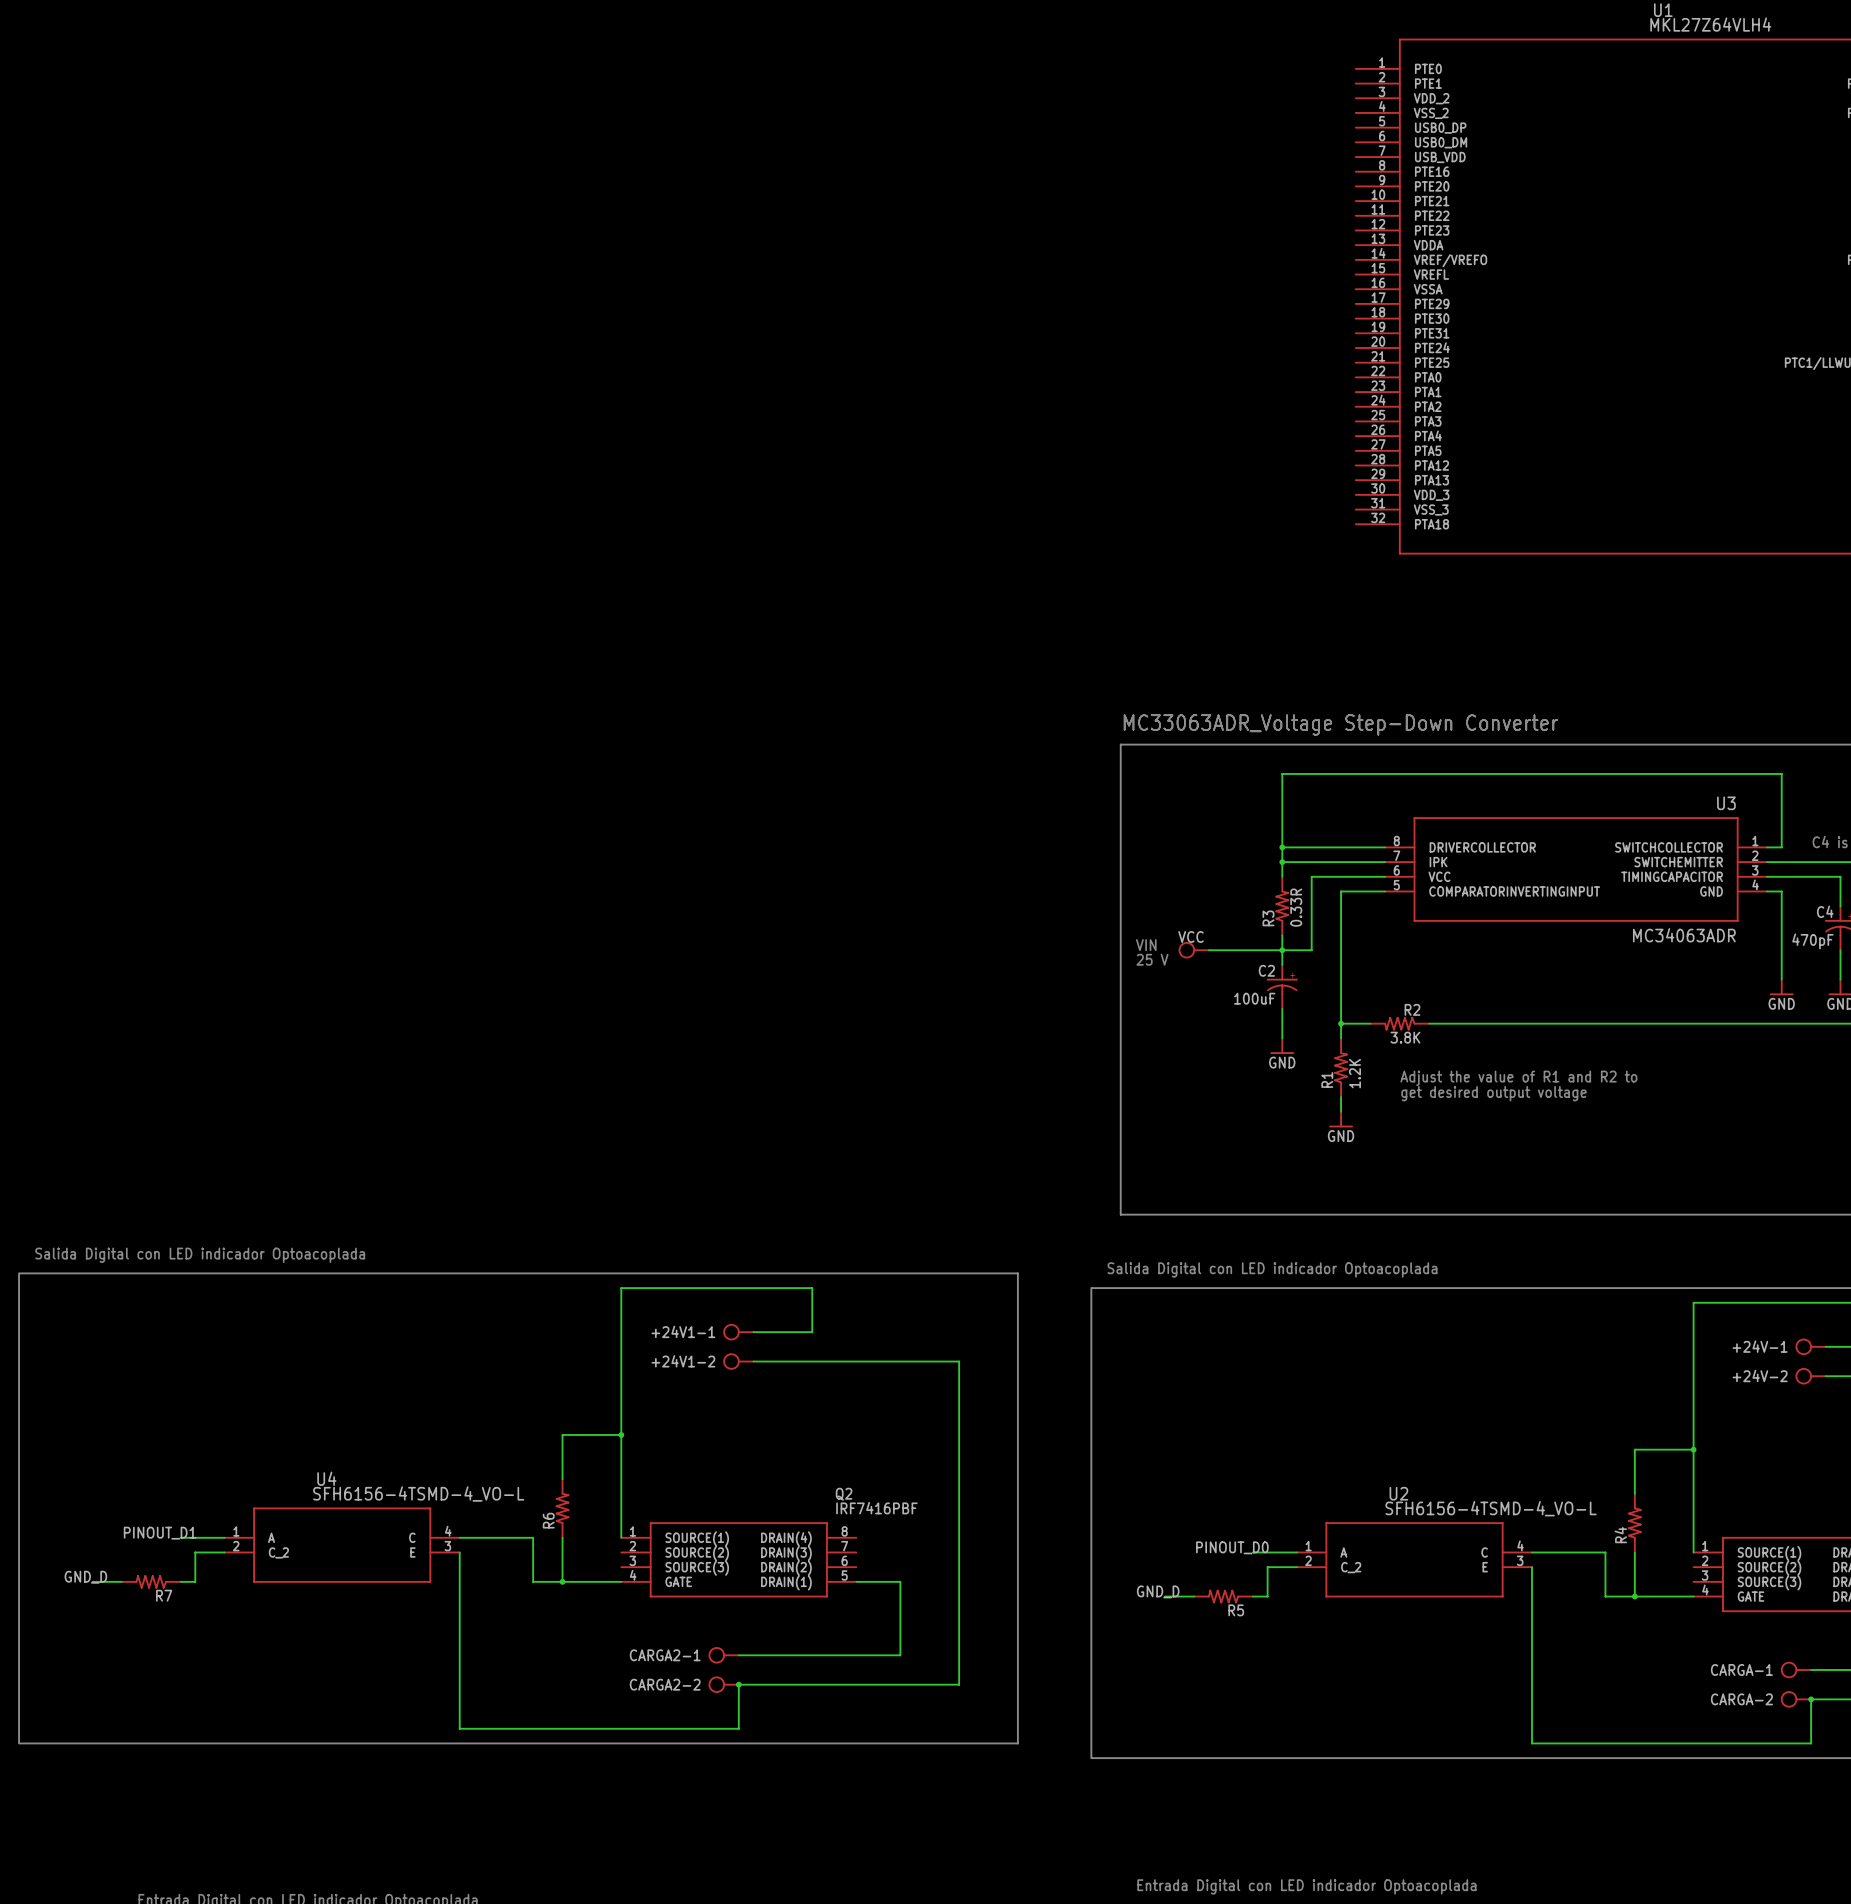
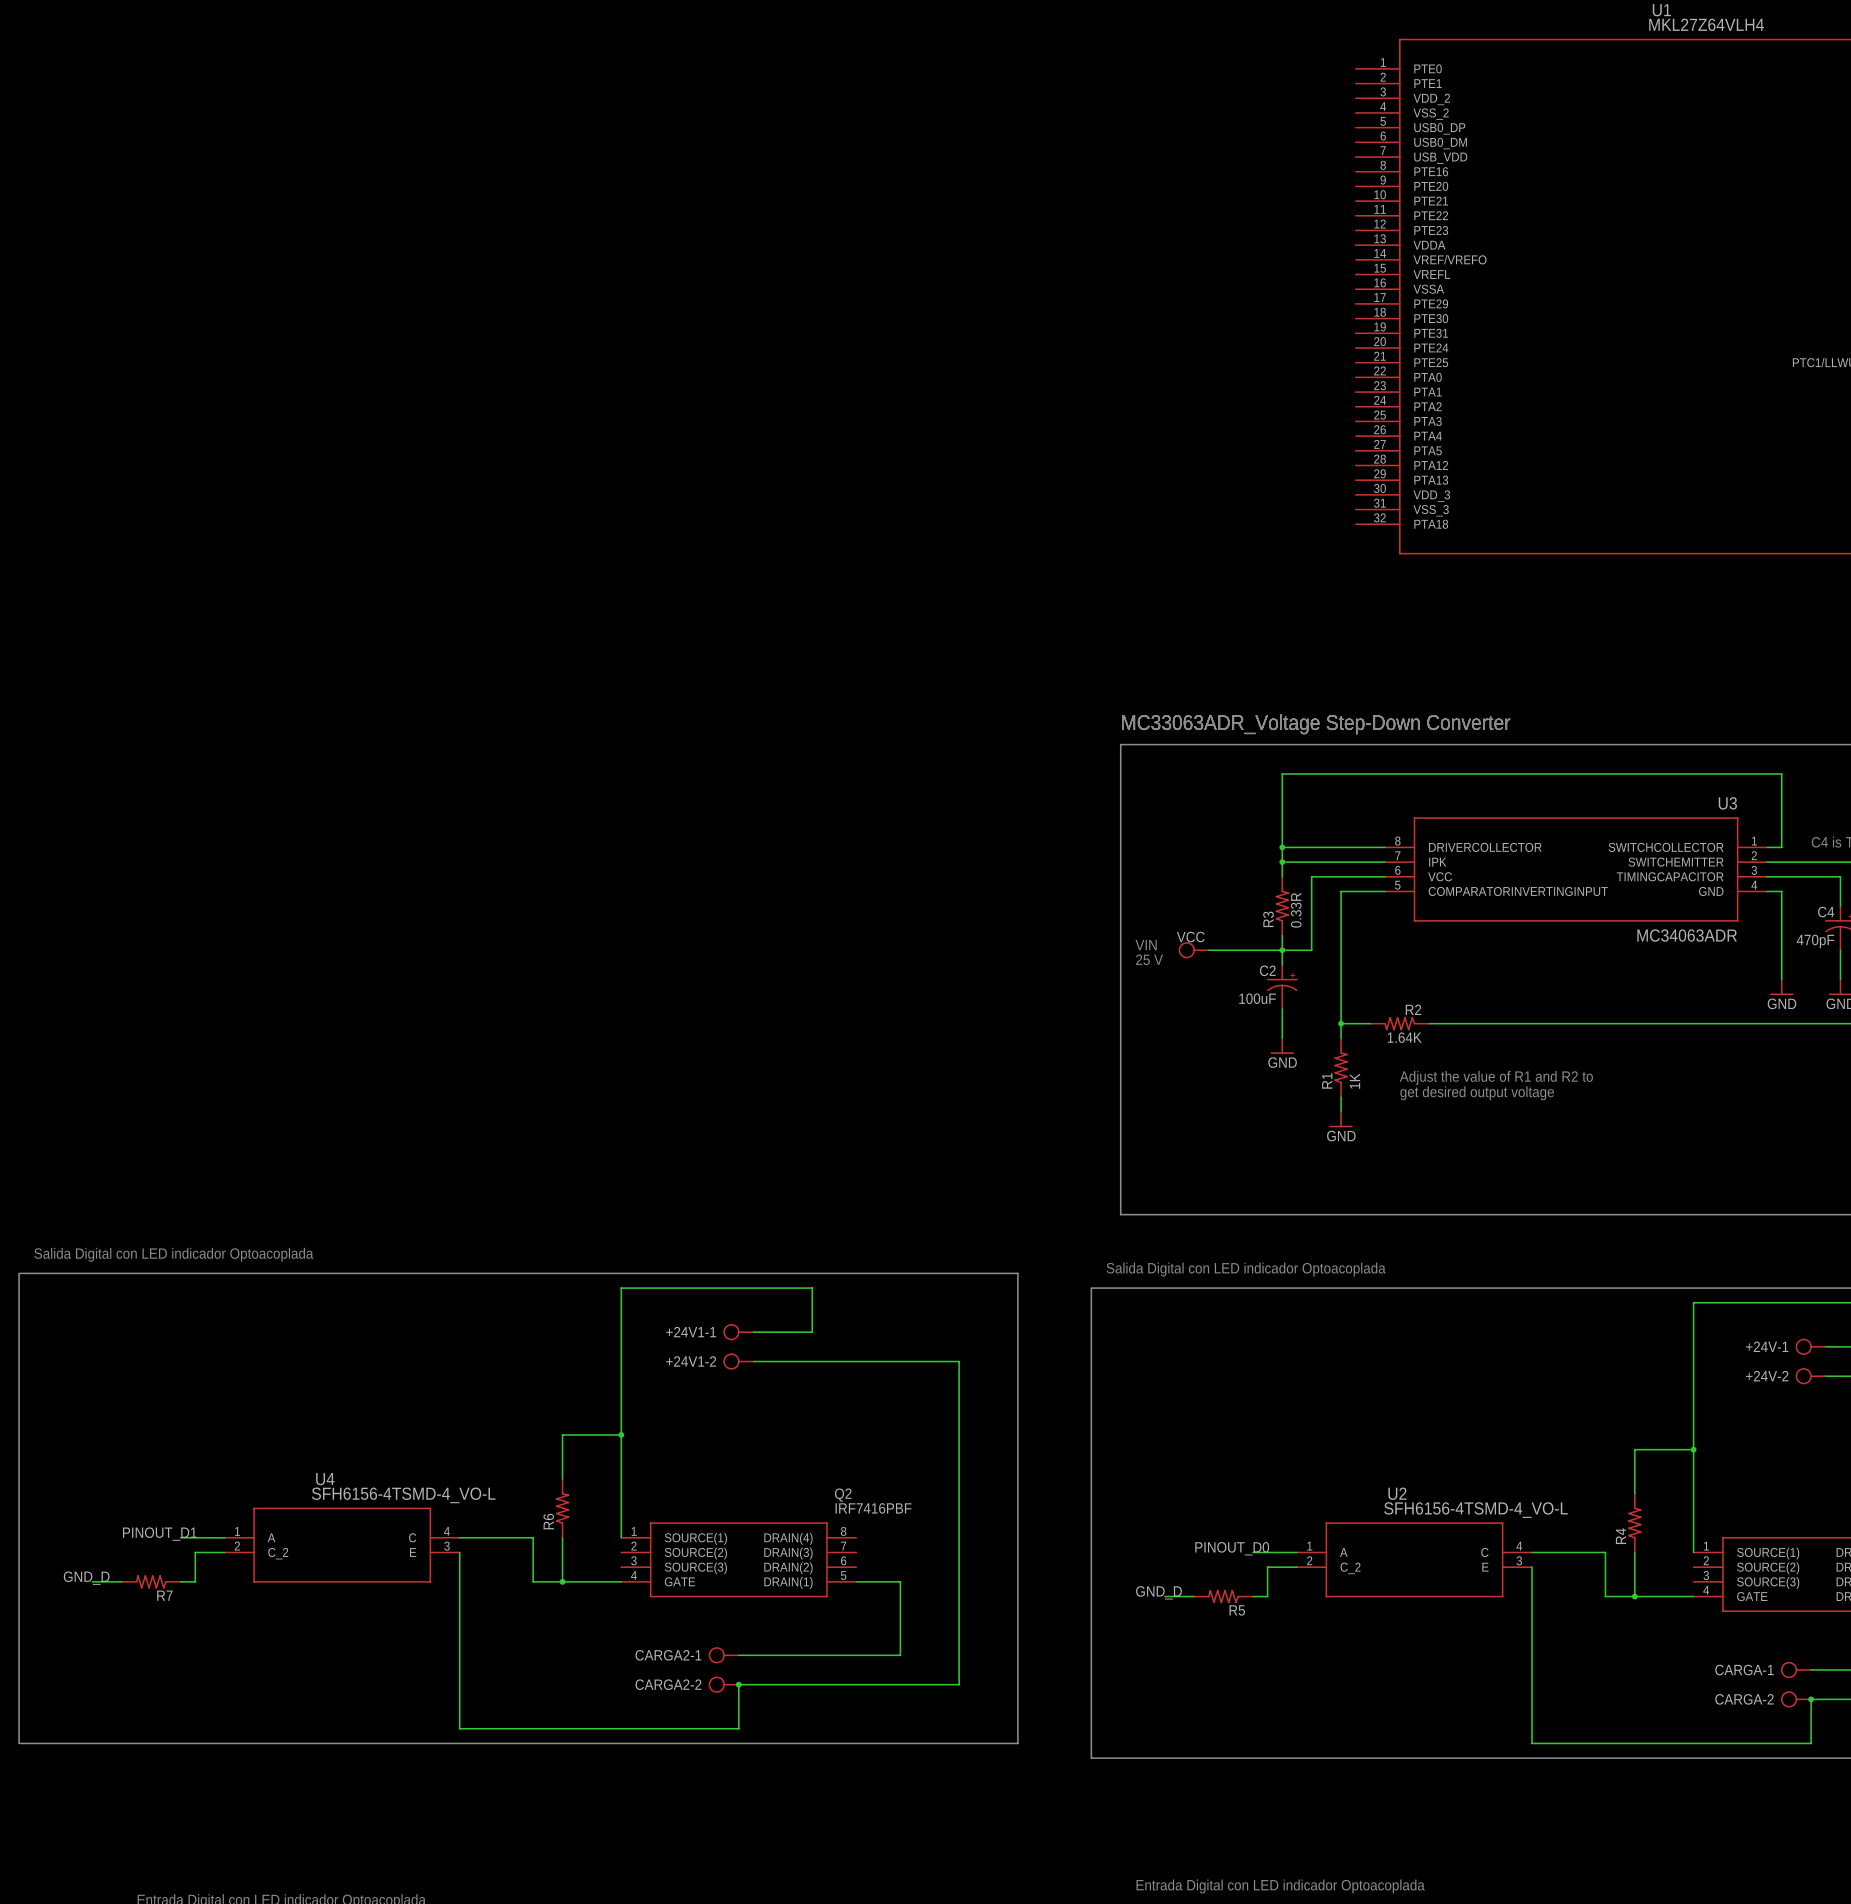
R2 value: 3.8K (1405, 1037) -> 1.64K (1404, 1037)
R1 value: 1.2K (1355, 1073) -> 1K (1355, 1081)

